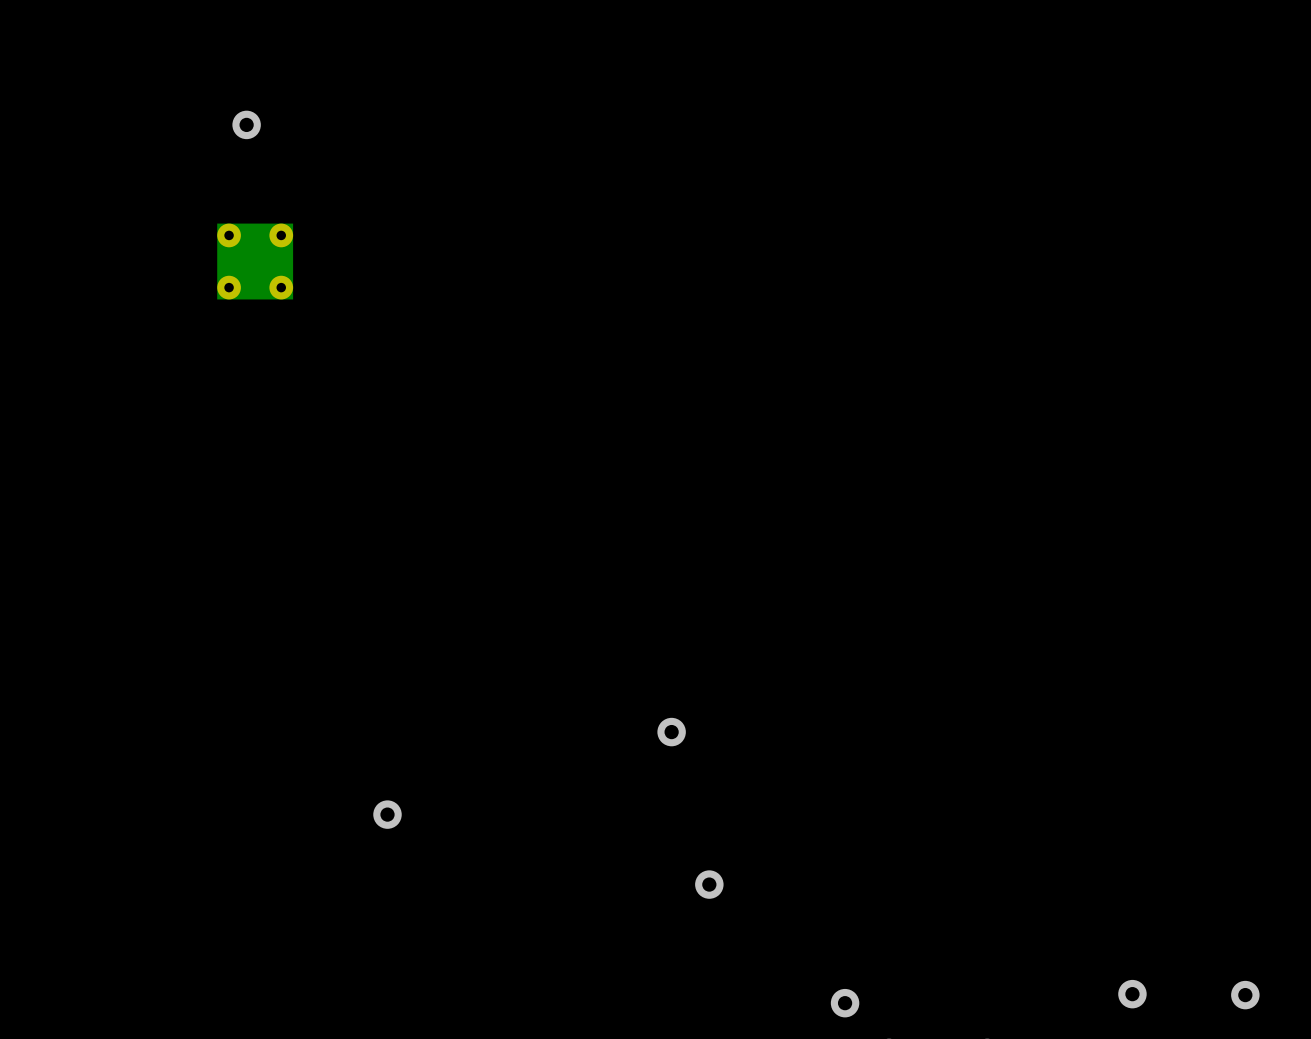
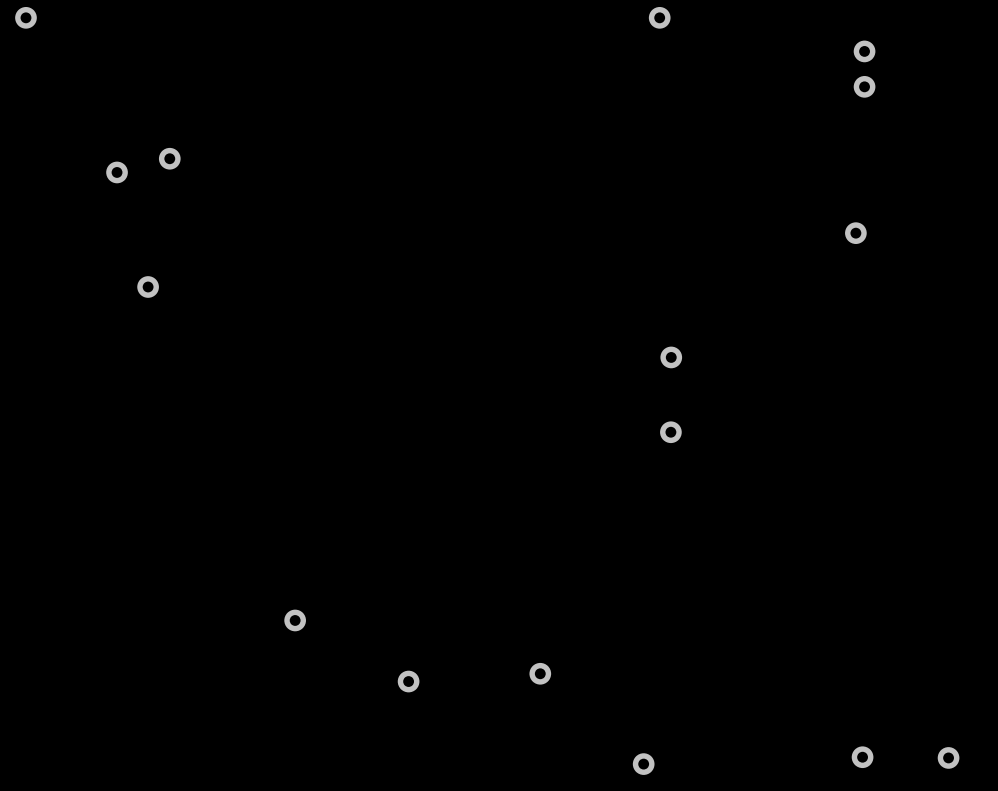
via: none -> (25, 17)
via: none -> (659, 17)
via: none -> (864, 51)
via: none -> (864, 86)
via: (246, 124) -> none
via: none -> (169, 158)
via: none -> (117, 172)
part: (255, 261) -> none
via: none -> (855, 233)
via: none -> (148, 286)
via: none -> (671, 357)
via: none -> (670, 432)
via: (671, 732) -> none
via: none -> (408, 681)

